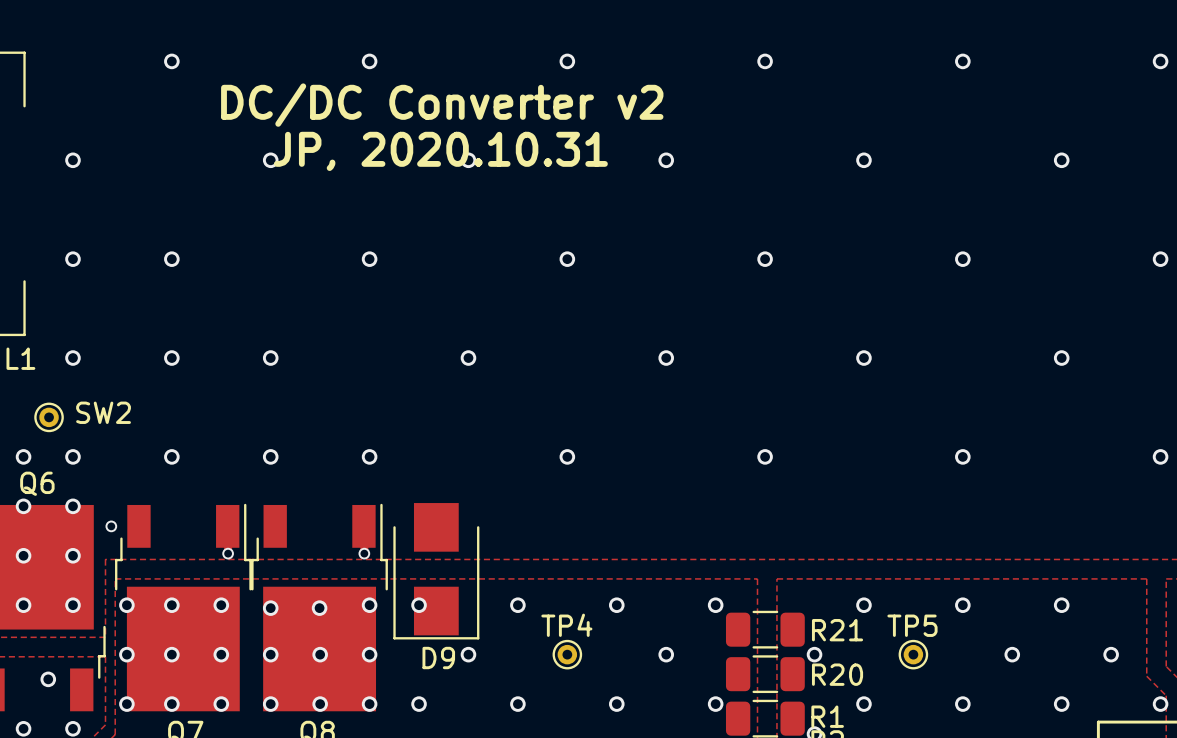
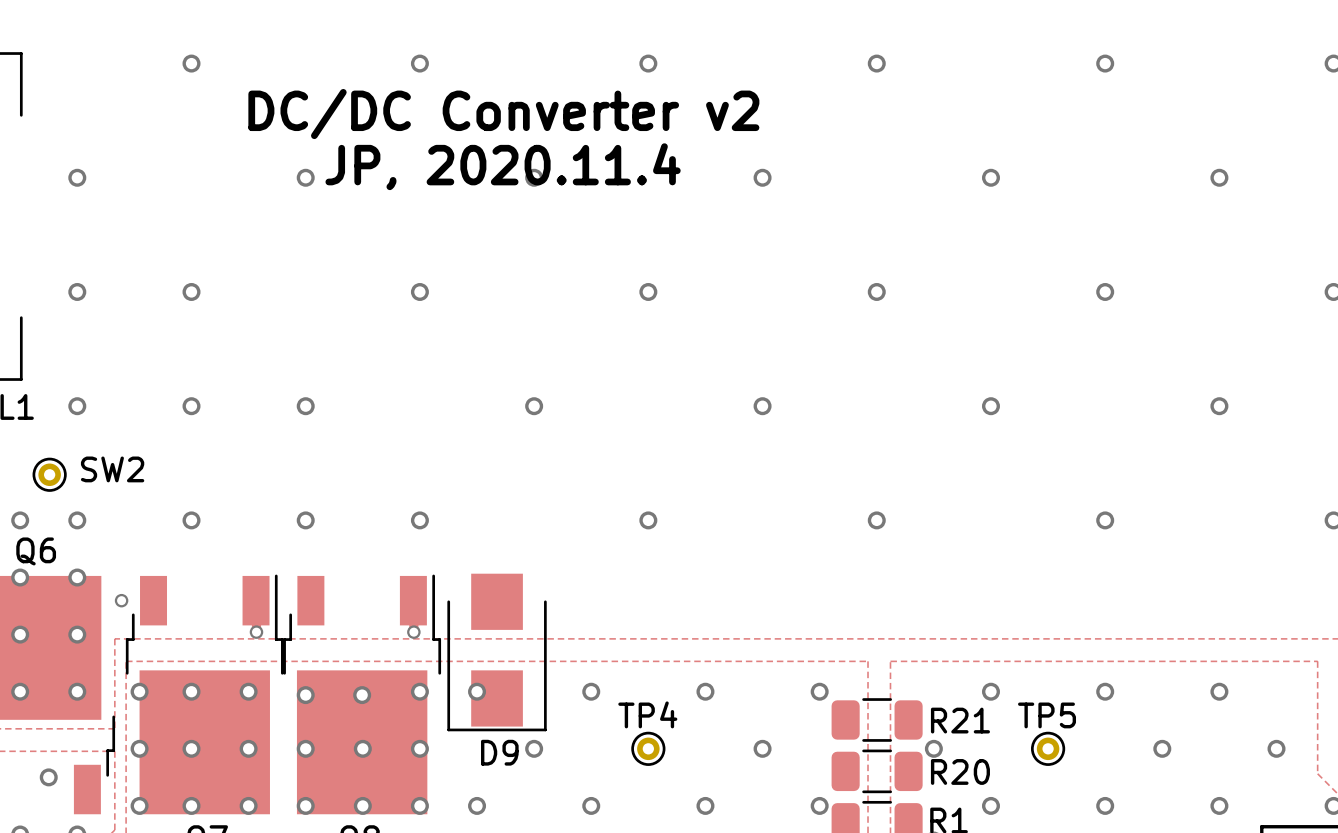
text: JP, 2020.10.31 (440, 151) -> JP, 2020.11.4 (503, 166)

